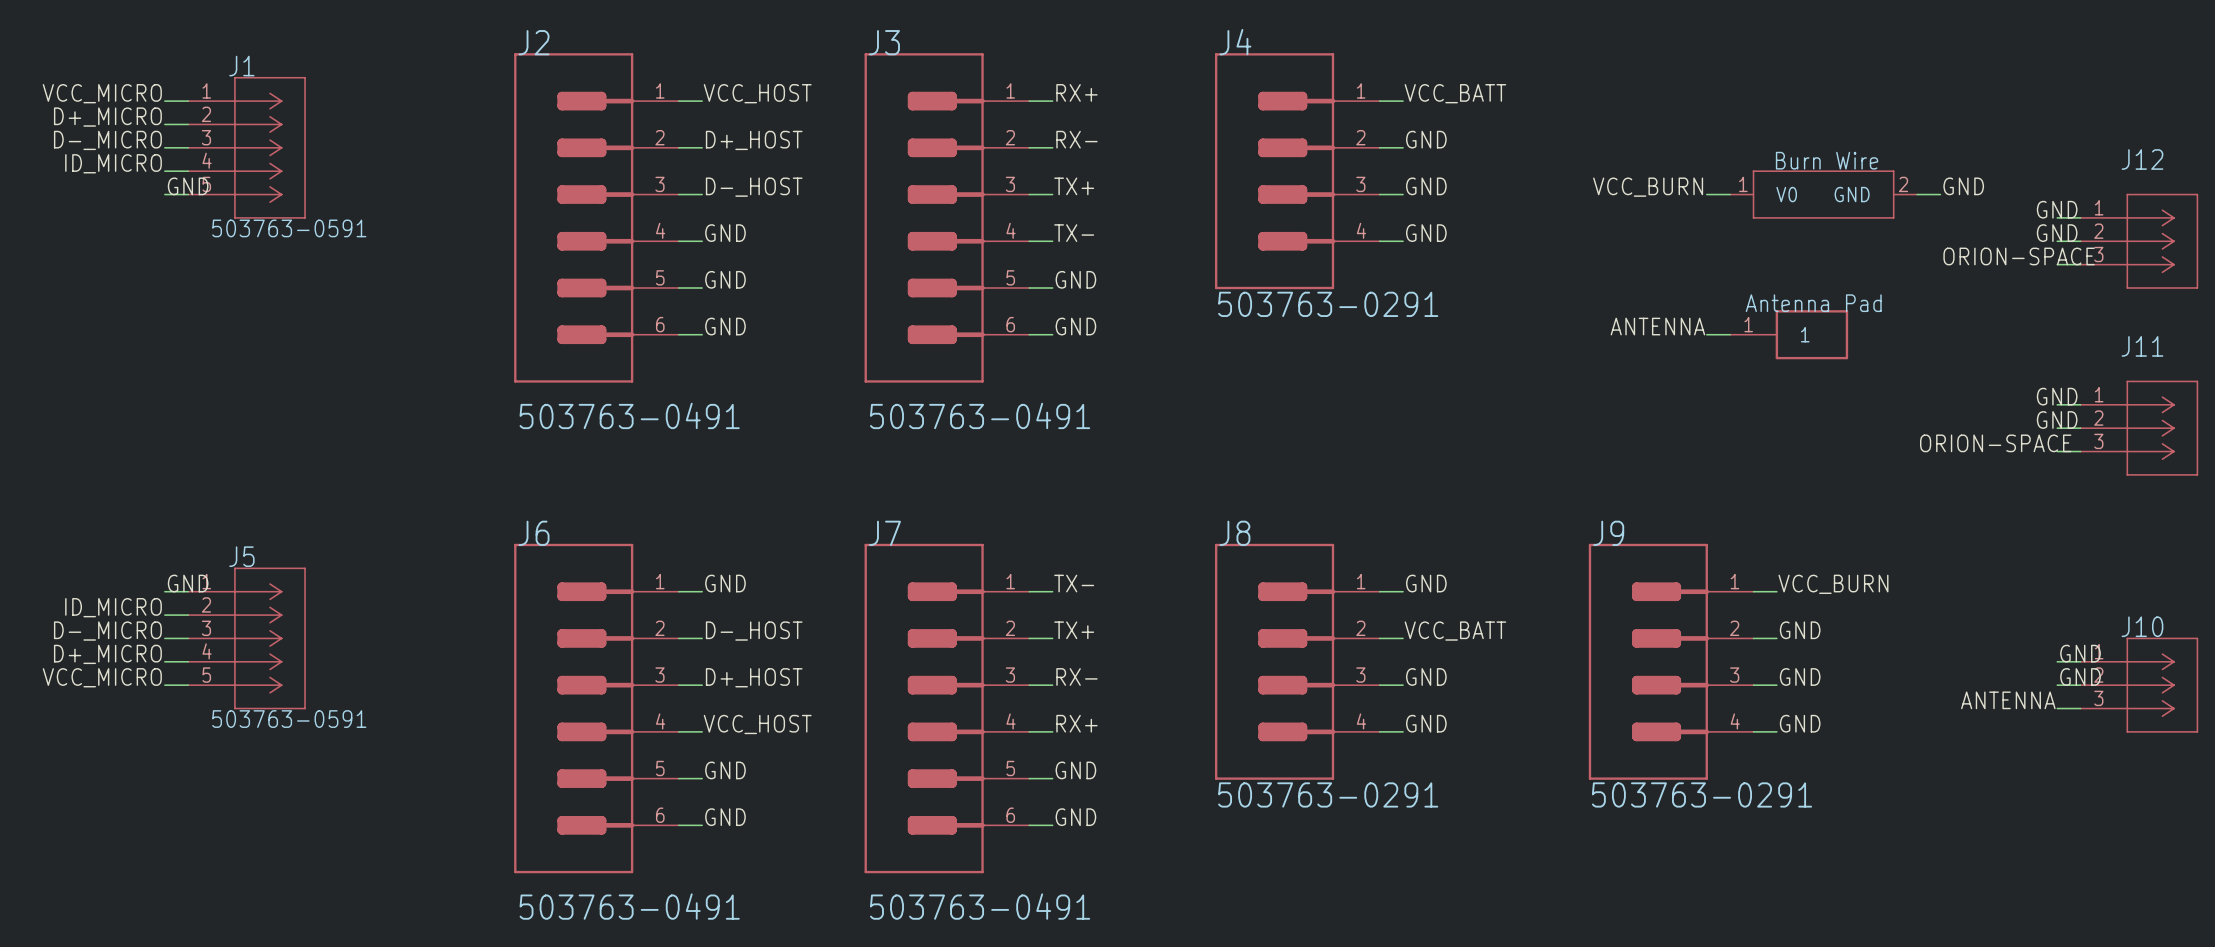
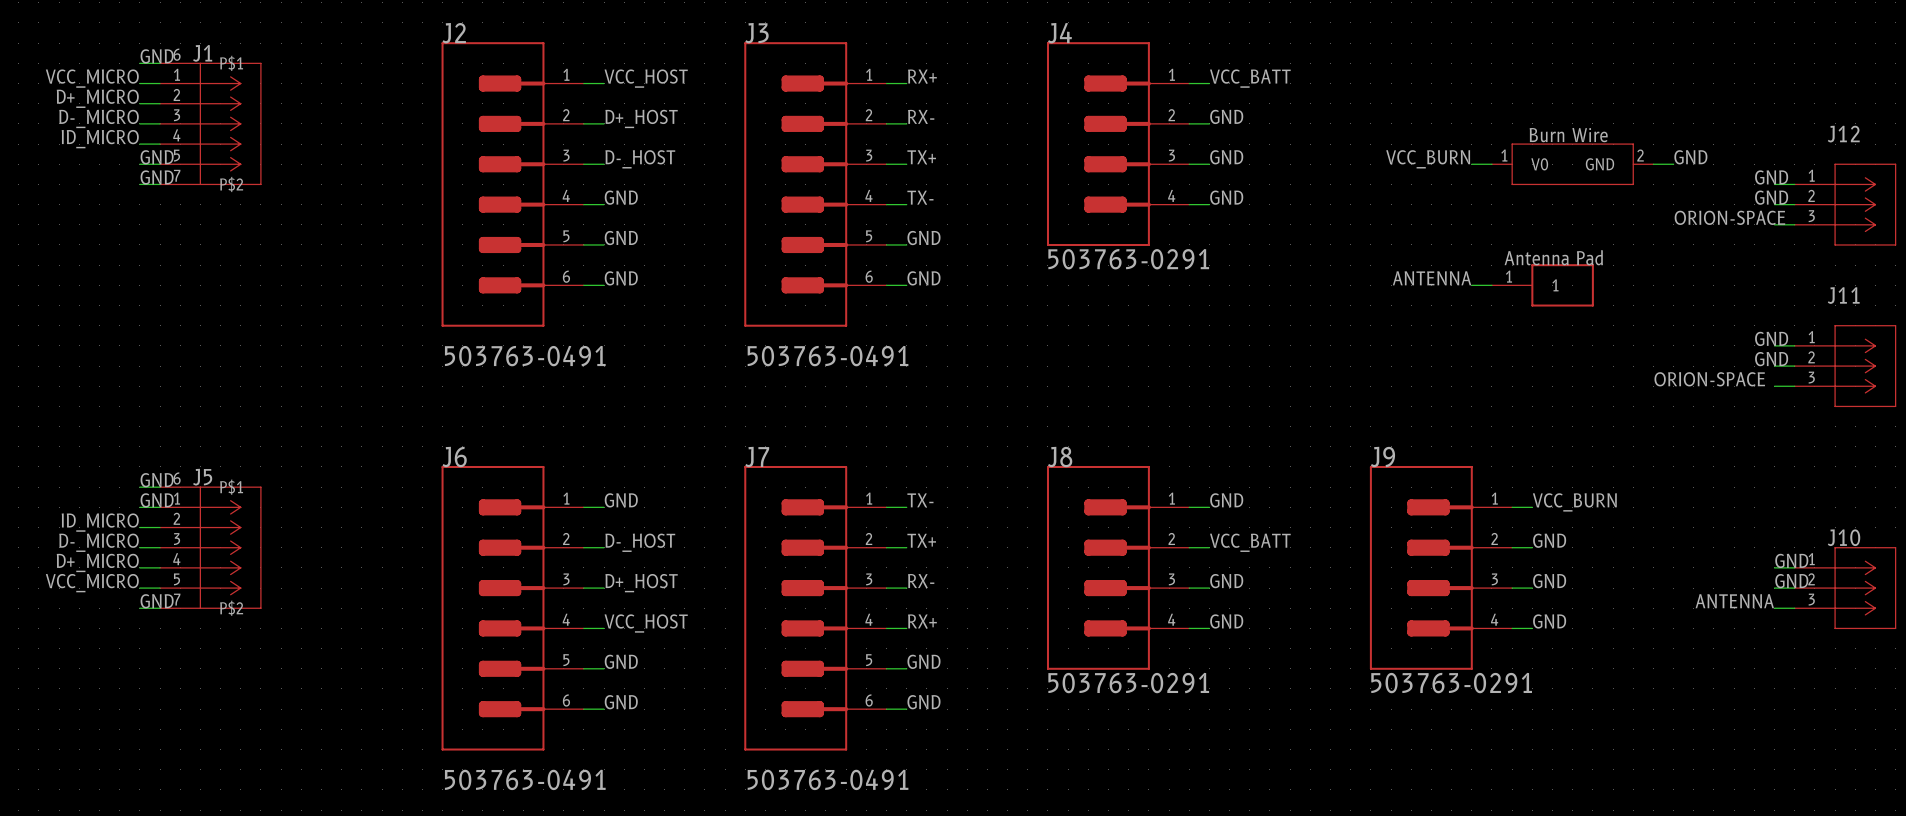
label: none -> GND (157, 56)
wire: none -> (139, 63) (160, 63)
J1 symbol: [188, 77, 306, 219] -> [160, 62, 262, 186]
label: none -> GND (157, 177)
wire: none -> (139, 184) (160, 184)
label: none -> GND (157, 480)
J5 symbol: [188, 567, 306, 710] -> [160, 486, 262, 609]
wire: none -> (139, 487) (160, 487)
label: none -> GND (157, 601)
wire: none -> (139, 608) (160, 608)

